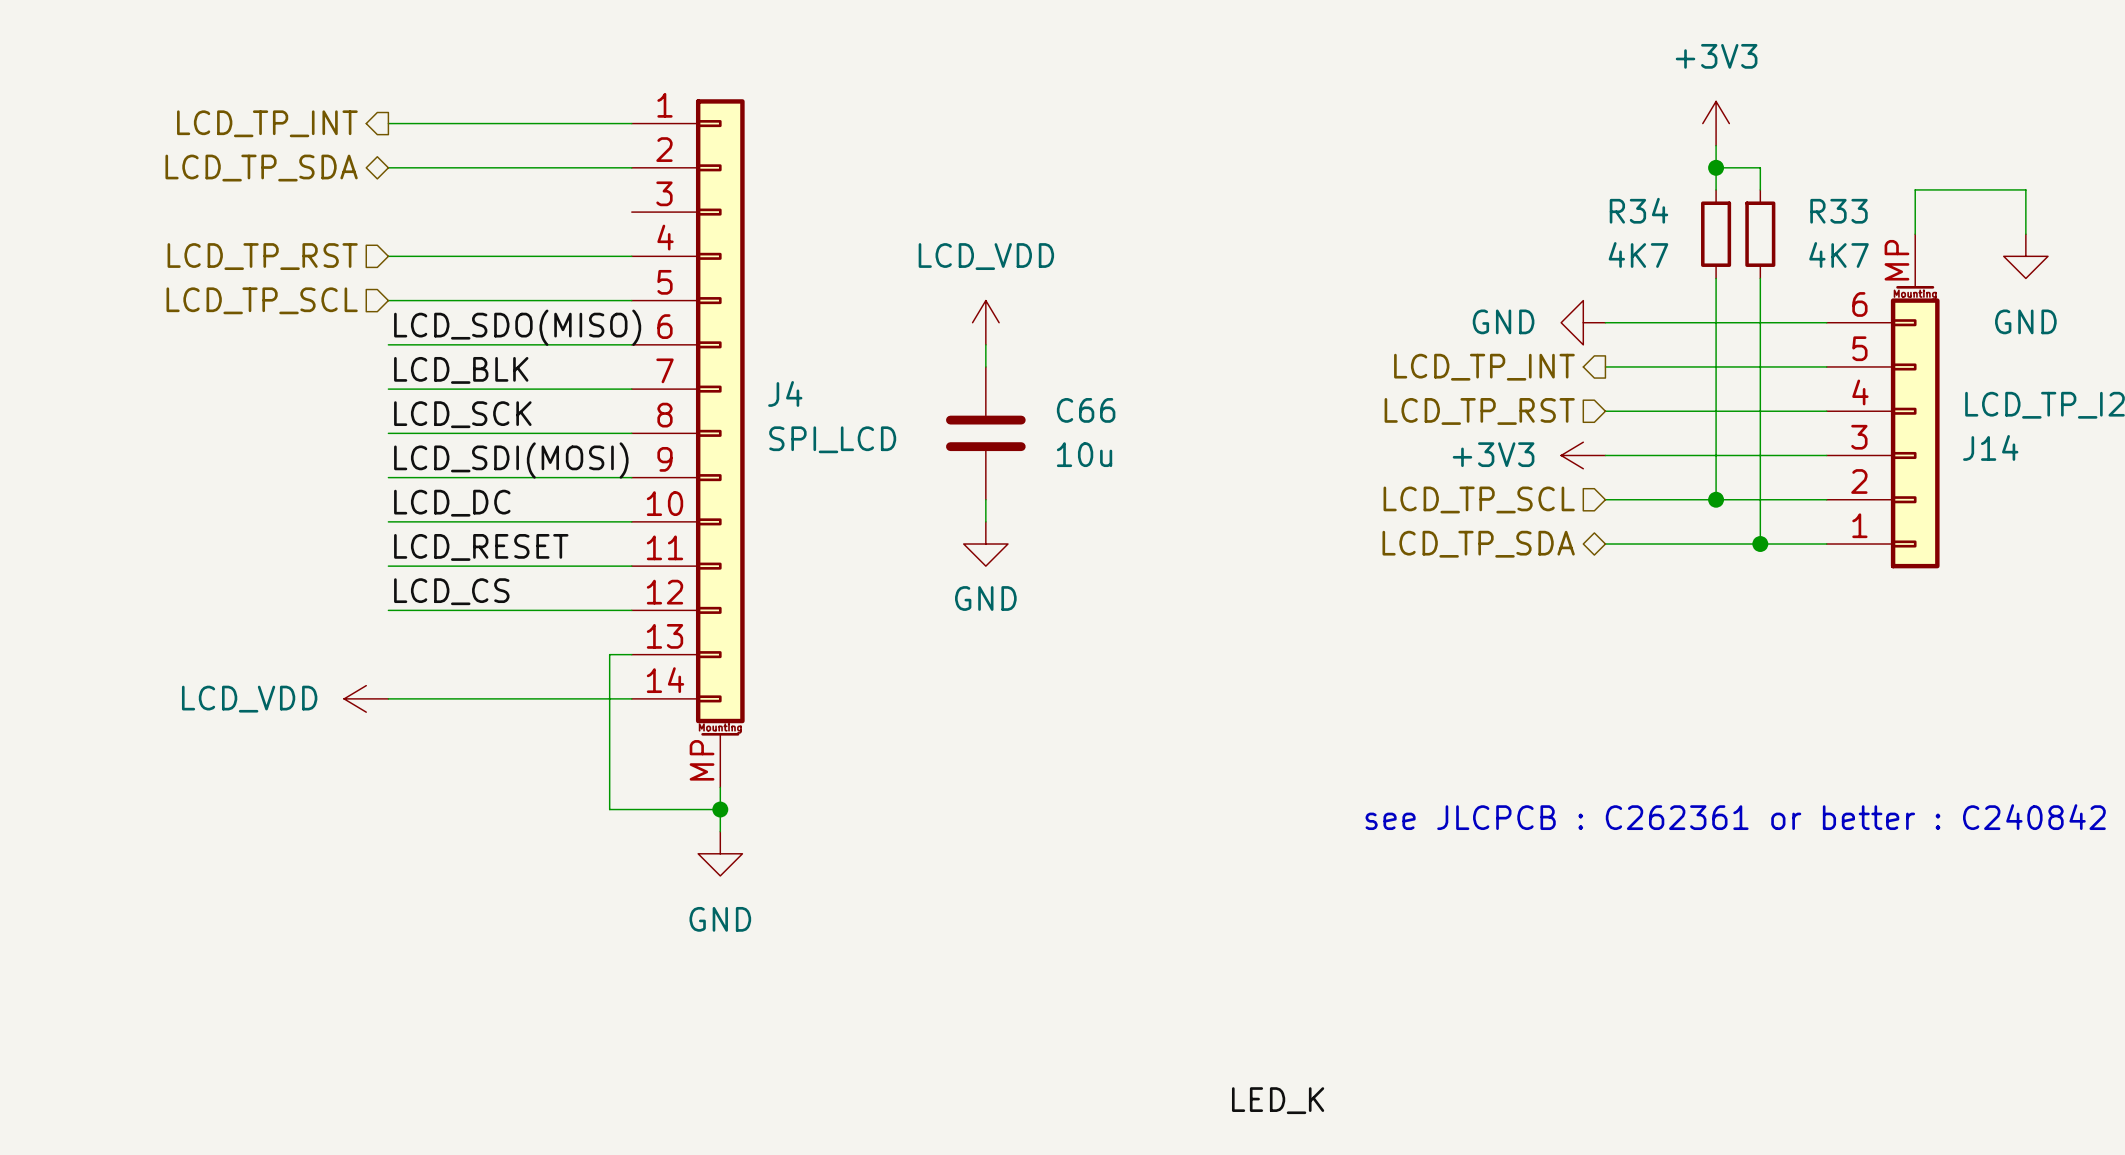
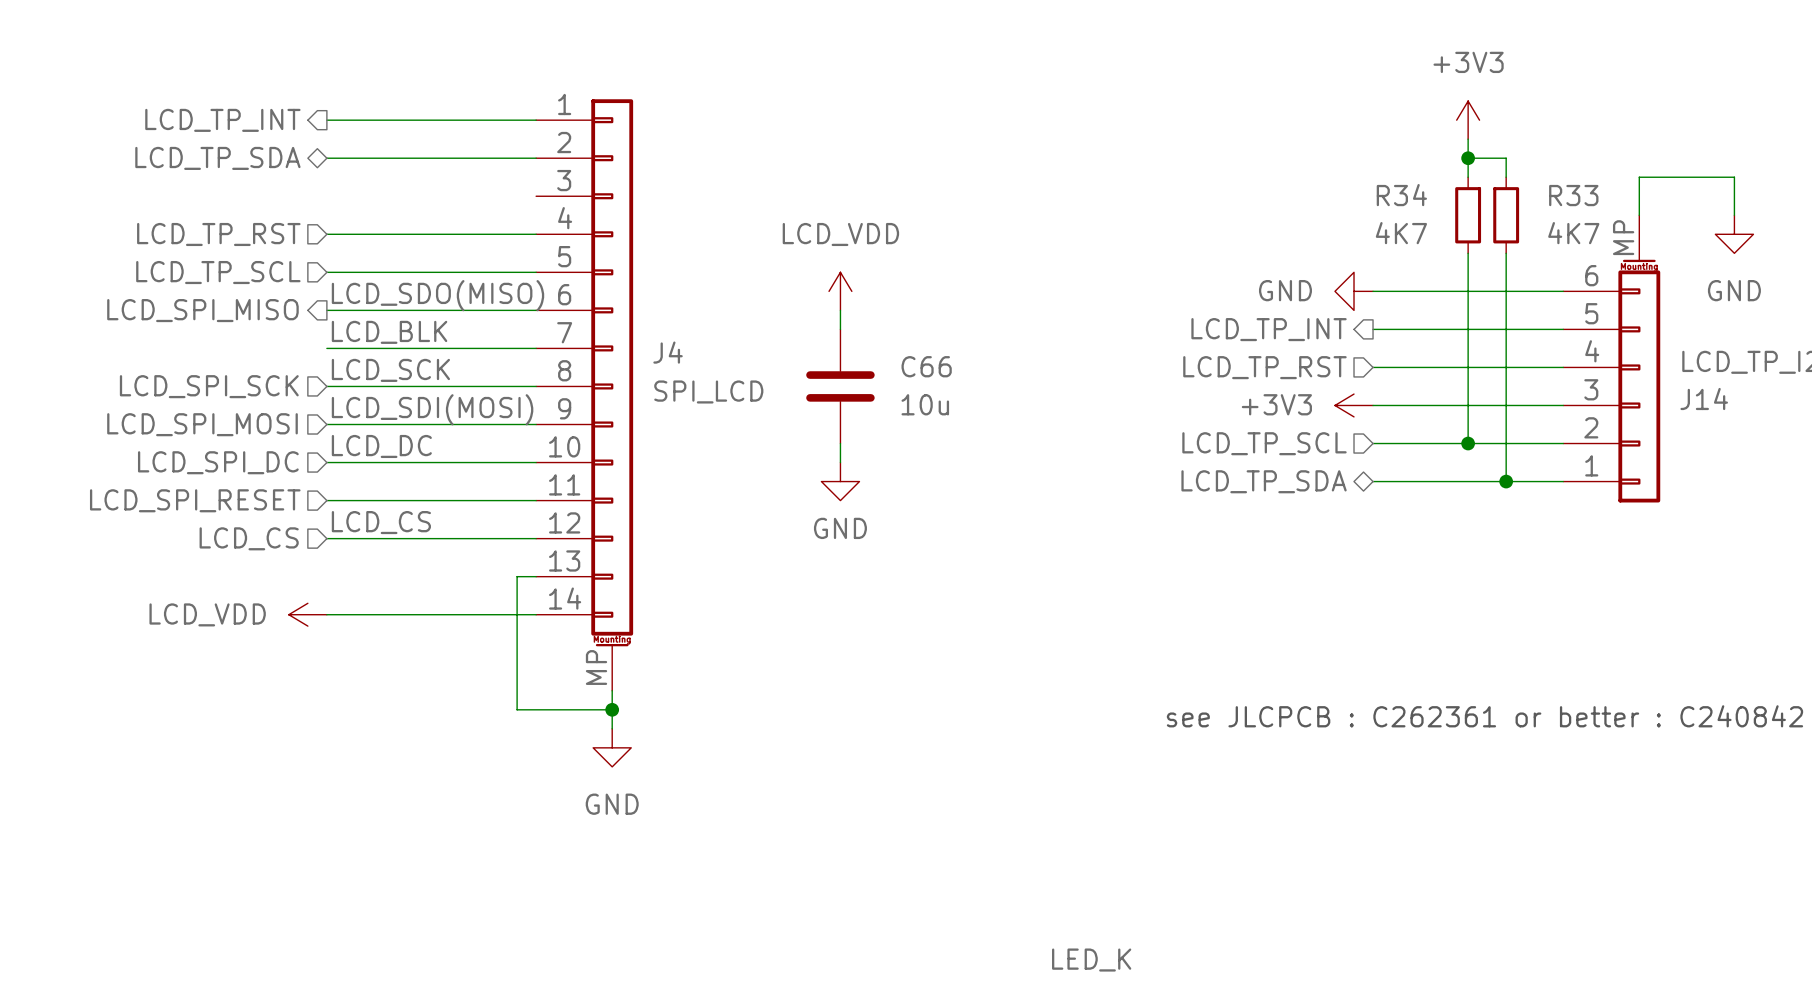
hierarchical label: none -> LCD_SPI_MISO (202, 310)
hierarchical label: none -> LCD_SPI_SCK (209, 386)
hierarchical label: none -> LCD_SPI_MOSI (202, 424)
hierarchical label: none -> LCD_SPI_DC (218, 462)
label: LCD_RESET (481, 547) -> none
hierarchical label: none -> LCD_SPI_RESET (195, 500)
hierarchical label: none -> LCD_CS (249, 538)

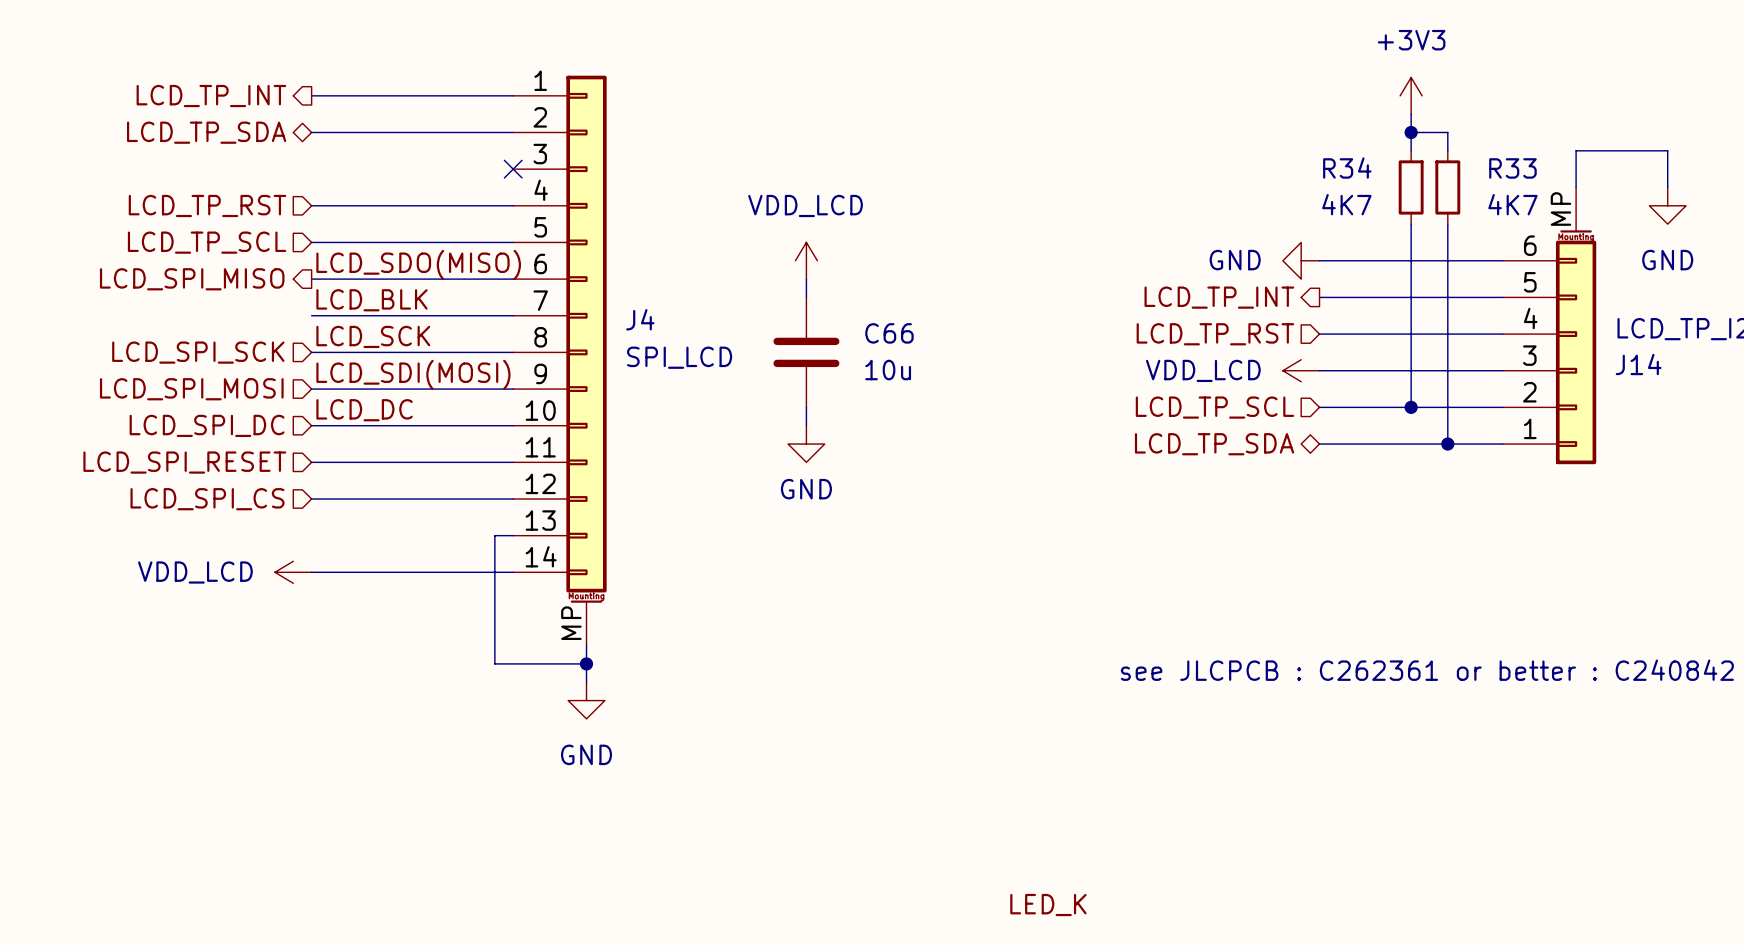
no-connect mark: none -> (513, 169)
power symbol: LCD_VDD (840, 291) -> VDD_LCD (806, 260)
power symbol: +3V3 (1354, 405) -> VDD_LCD (1301, 370)
label: LCD_CS (381, 522) -> none
hierarchical label: LCD_CS (249, 538) -> LCD_SPI_CS (207, 499)
power symbol: LCD_VDD (307, 614) -> VDD_LCD (293, 572)

